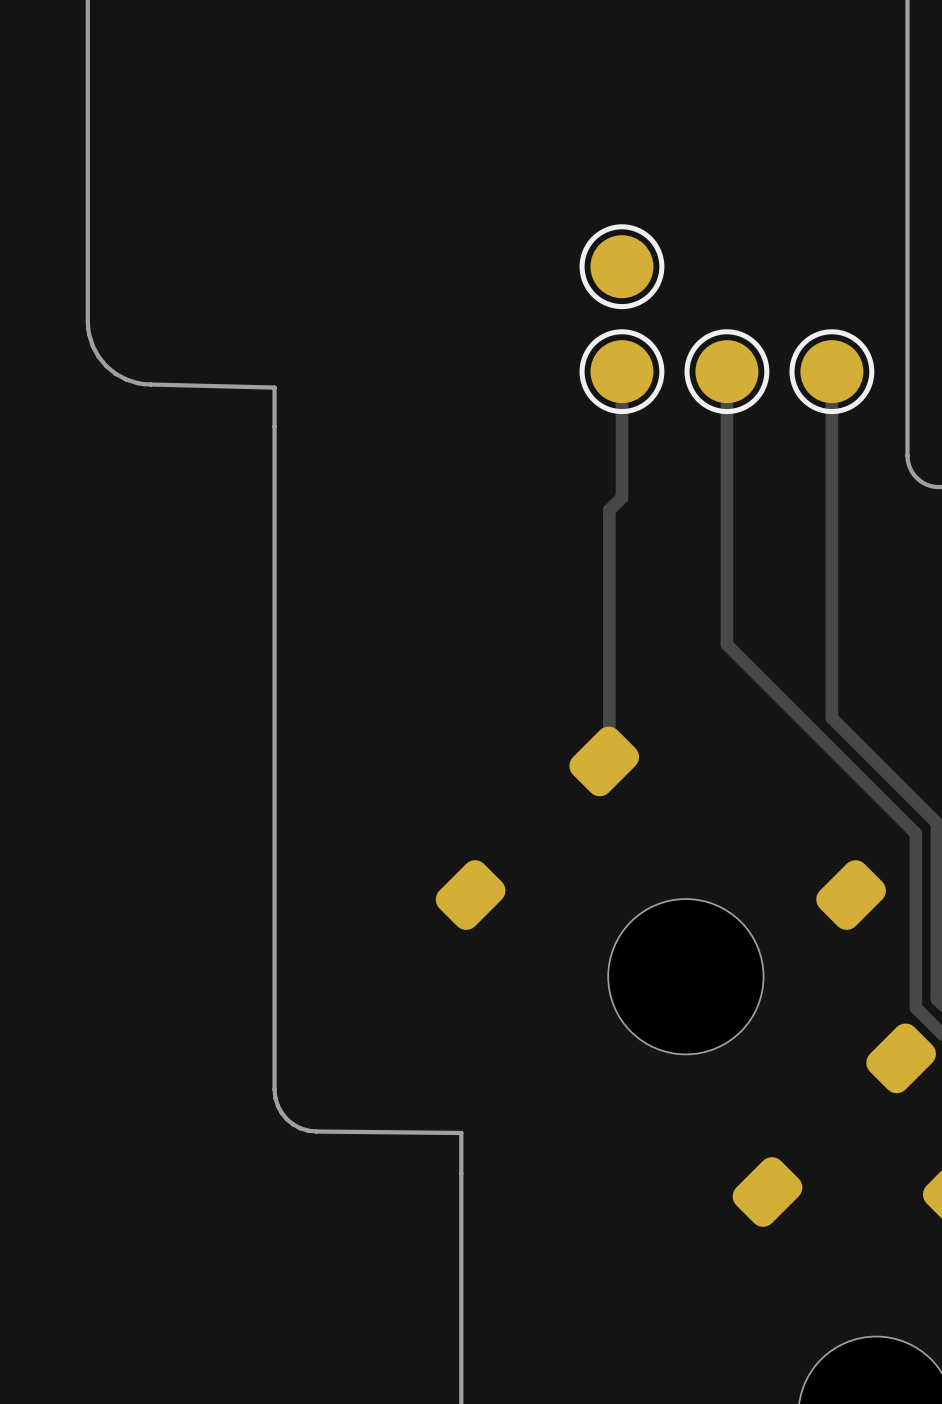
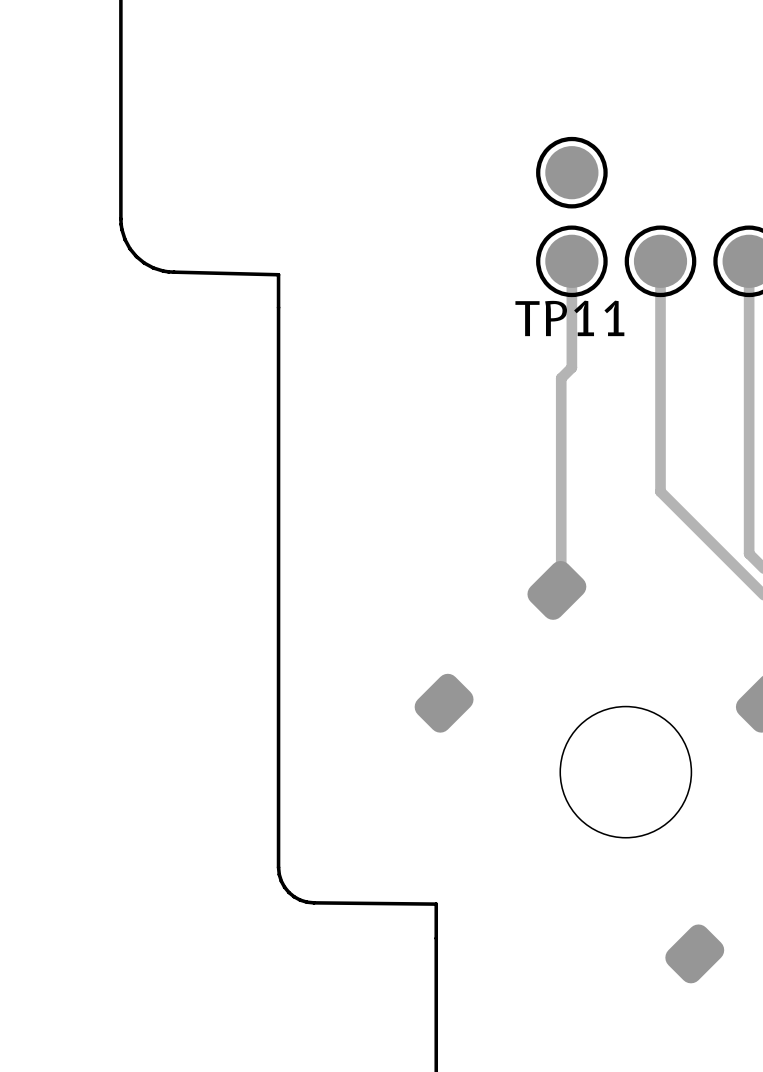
TP11 name: none -> TP11 (569, 318)

